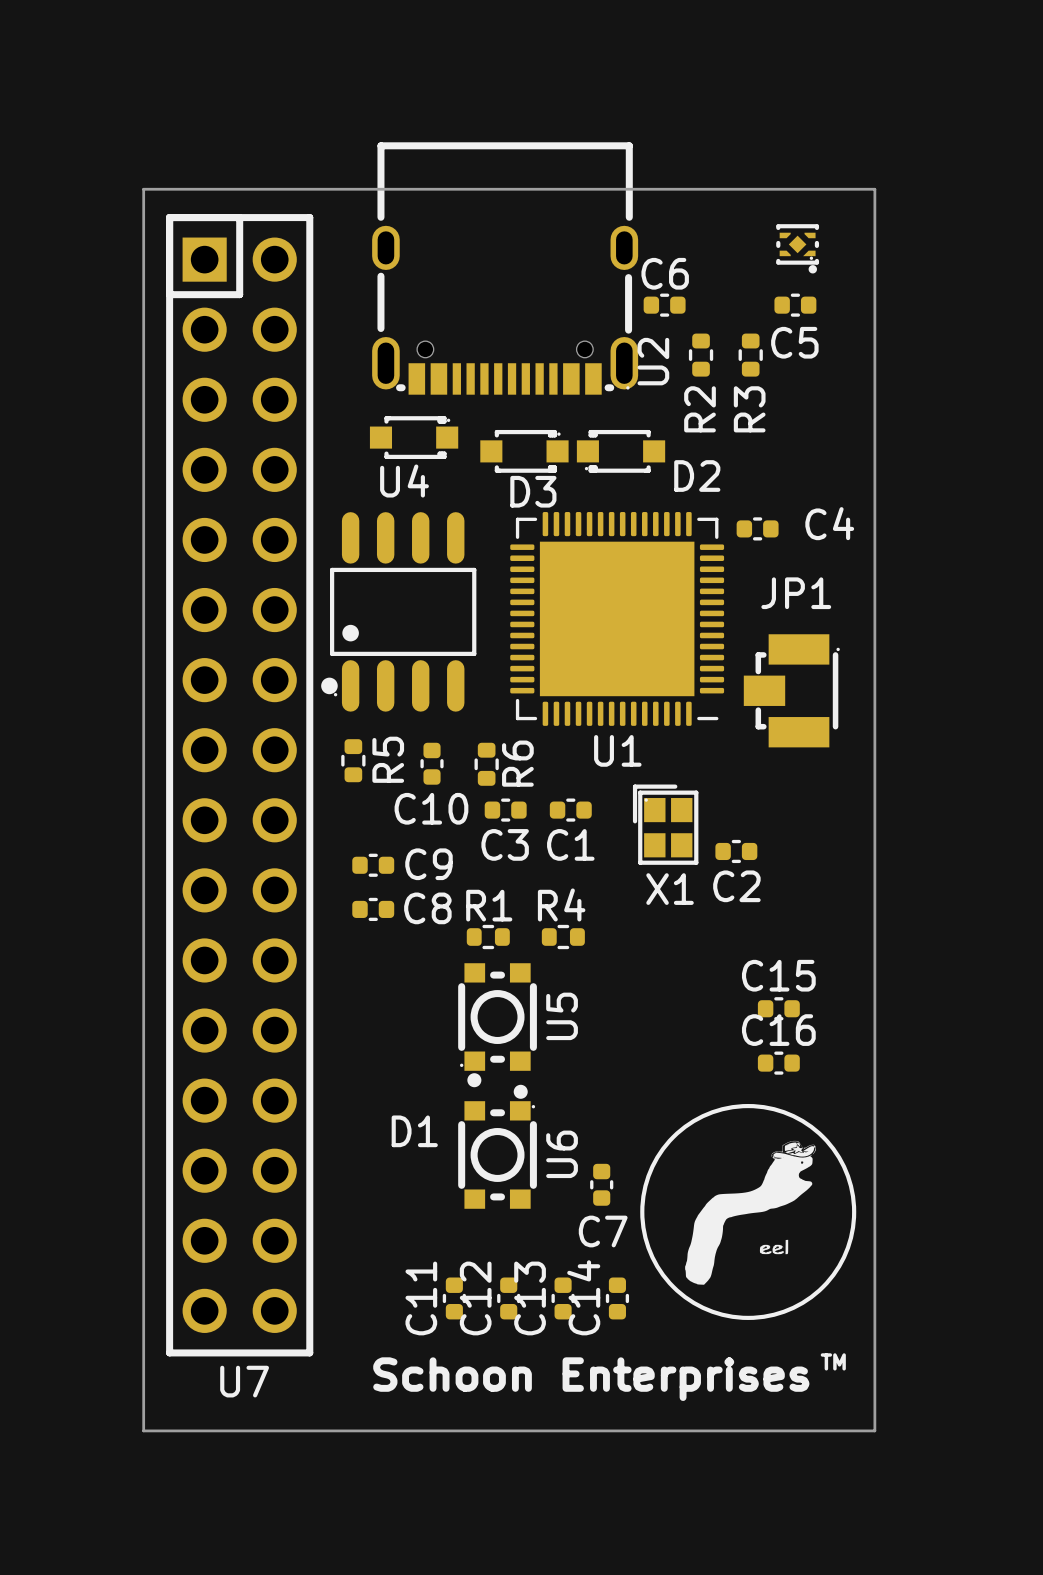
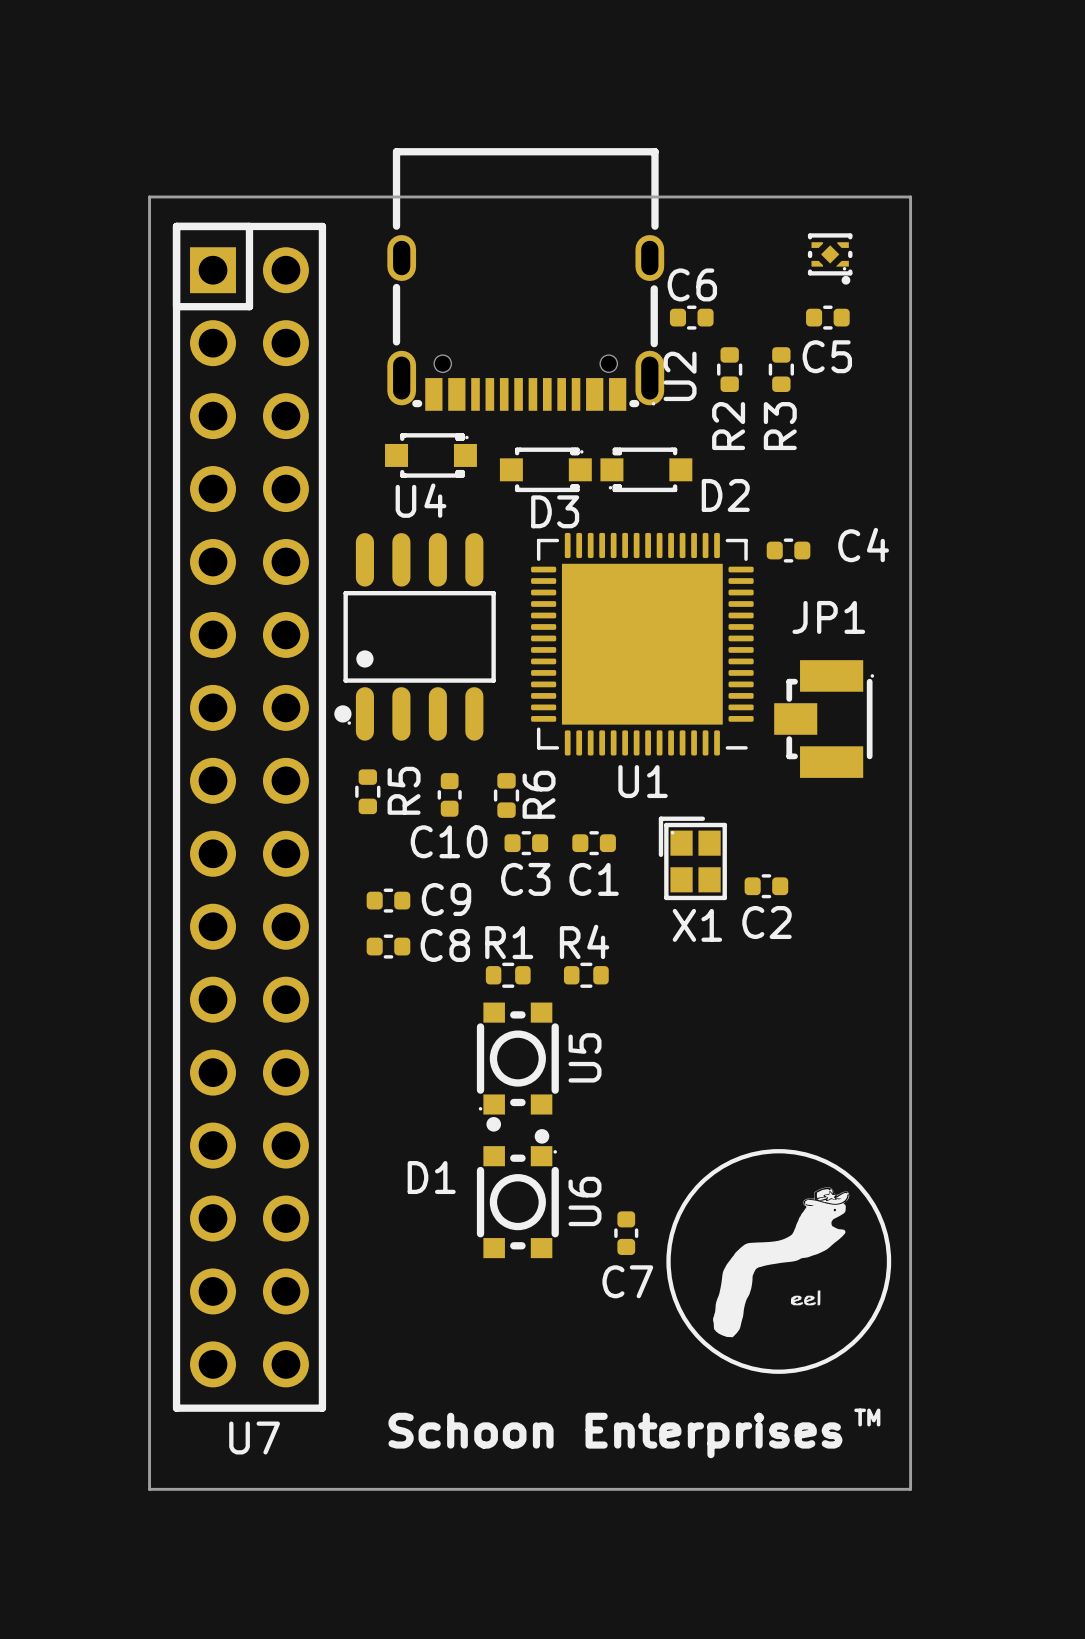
C15: (778, 1008) -> none
C16: (778, 1063) -> none
C11: (454, 1298) -> none
C12: (508, 1298) -> none
C13: (563, 1298) -> none
C14: (617, 1298) -> none

